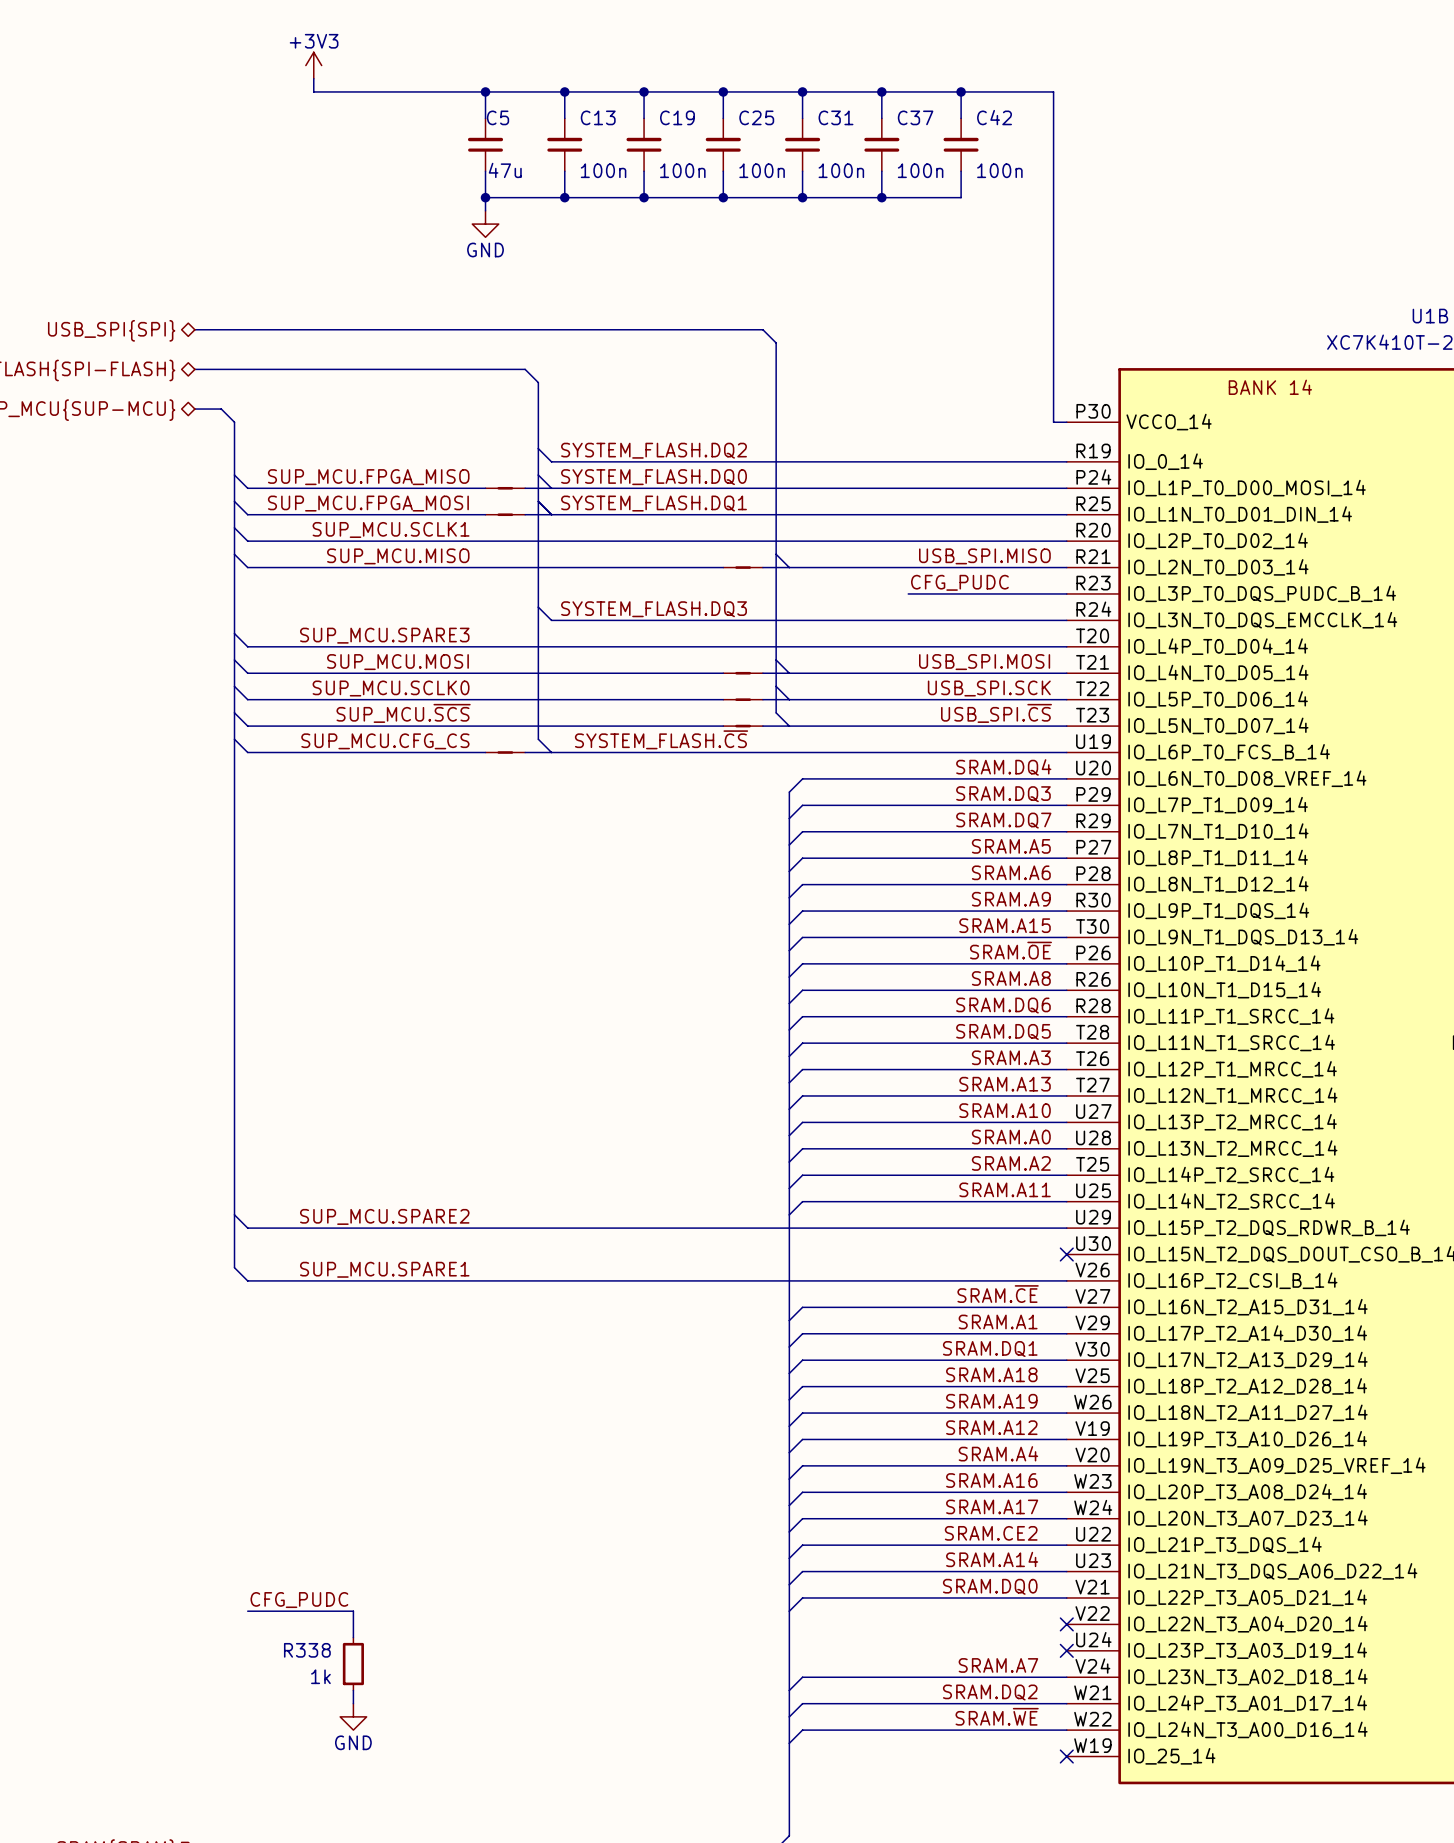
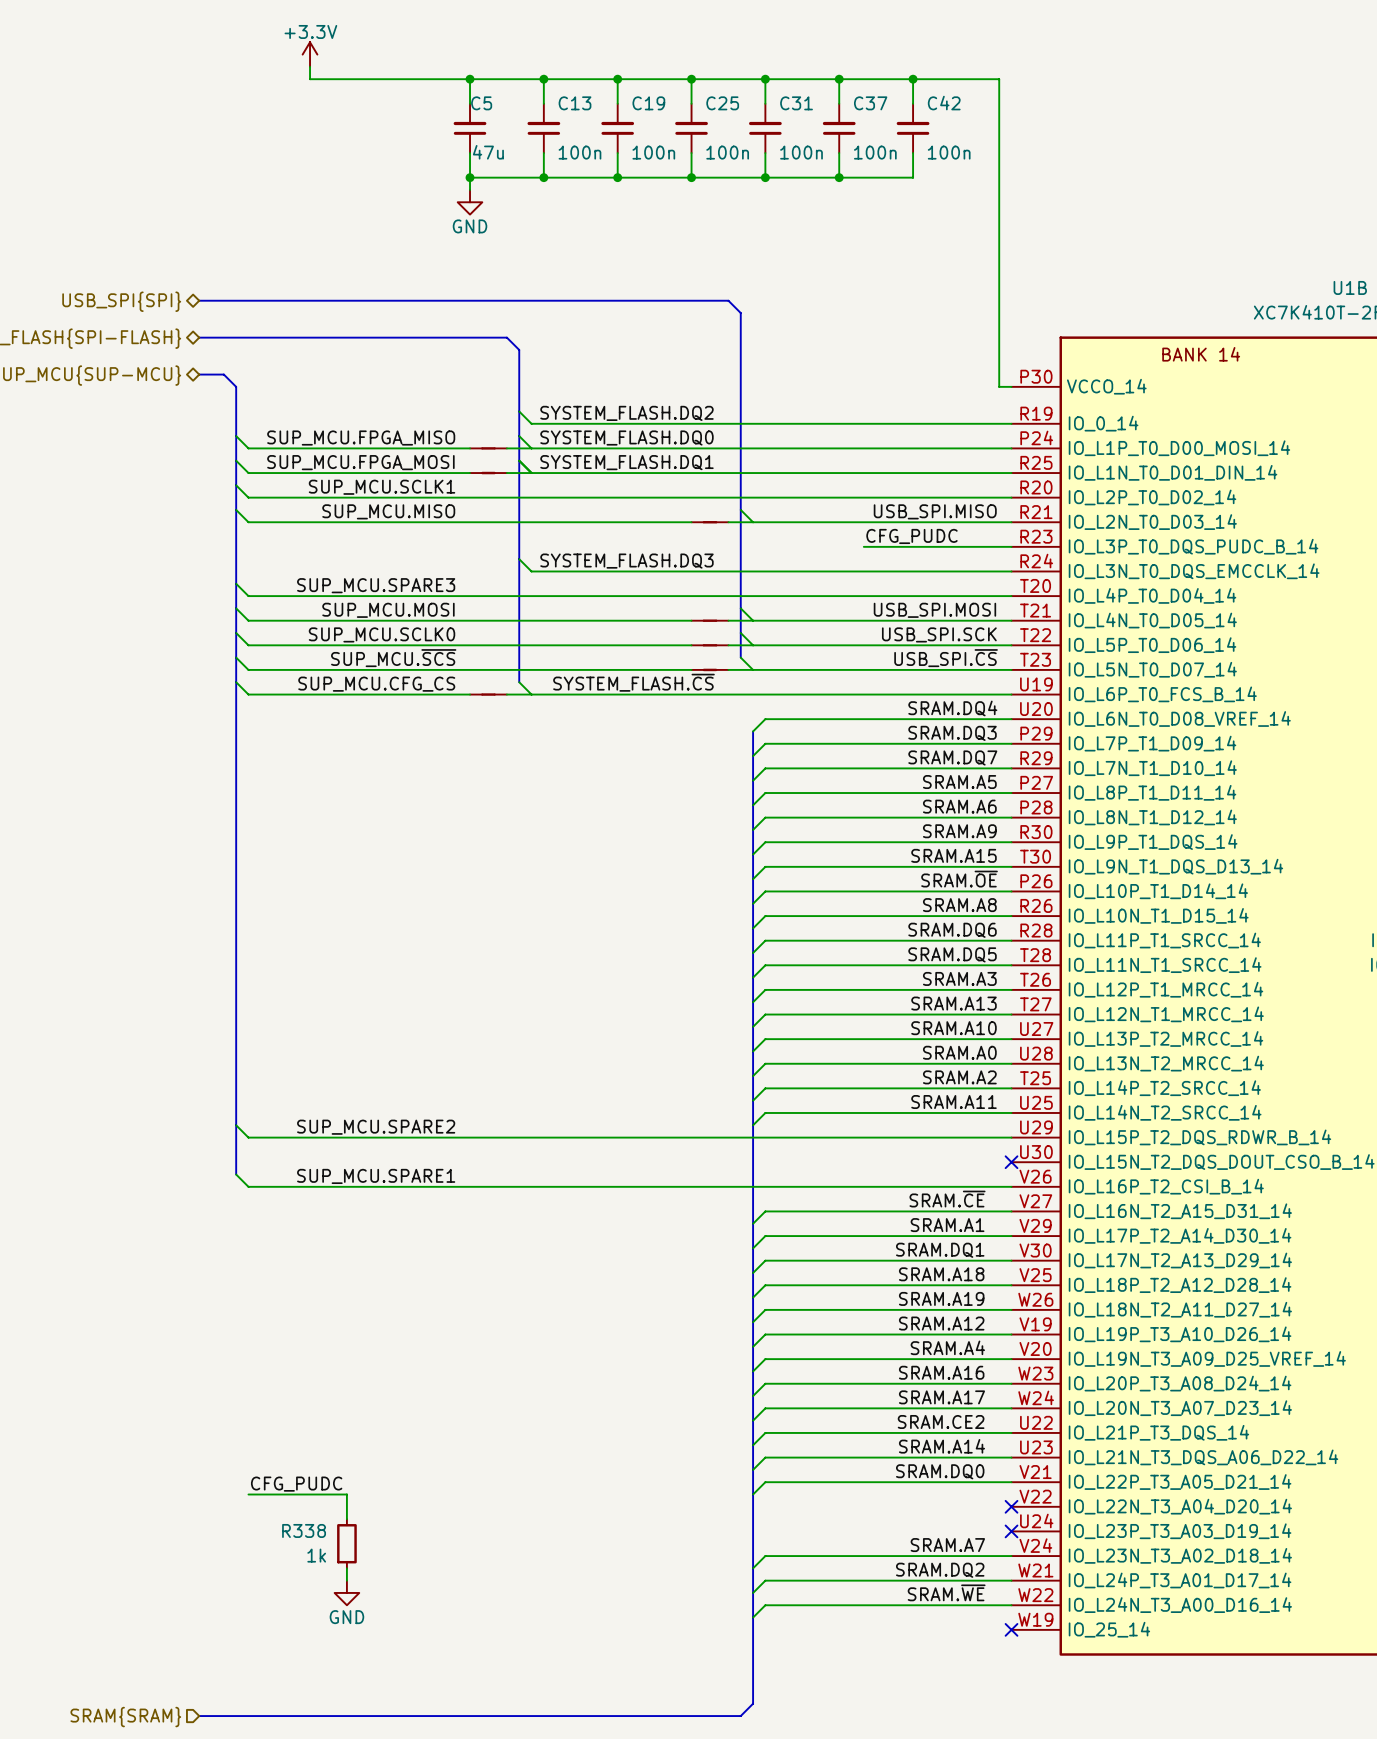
power symbol: +3V3 (313, 65) -> +3.3V (310, 54)

